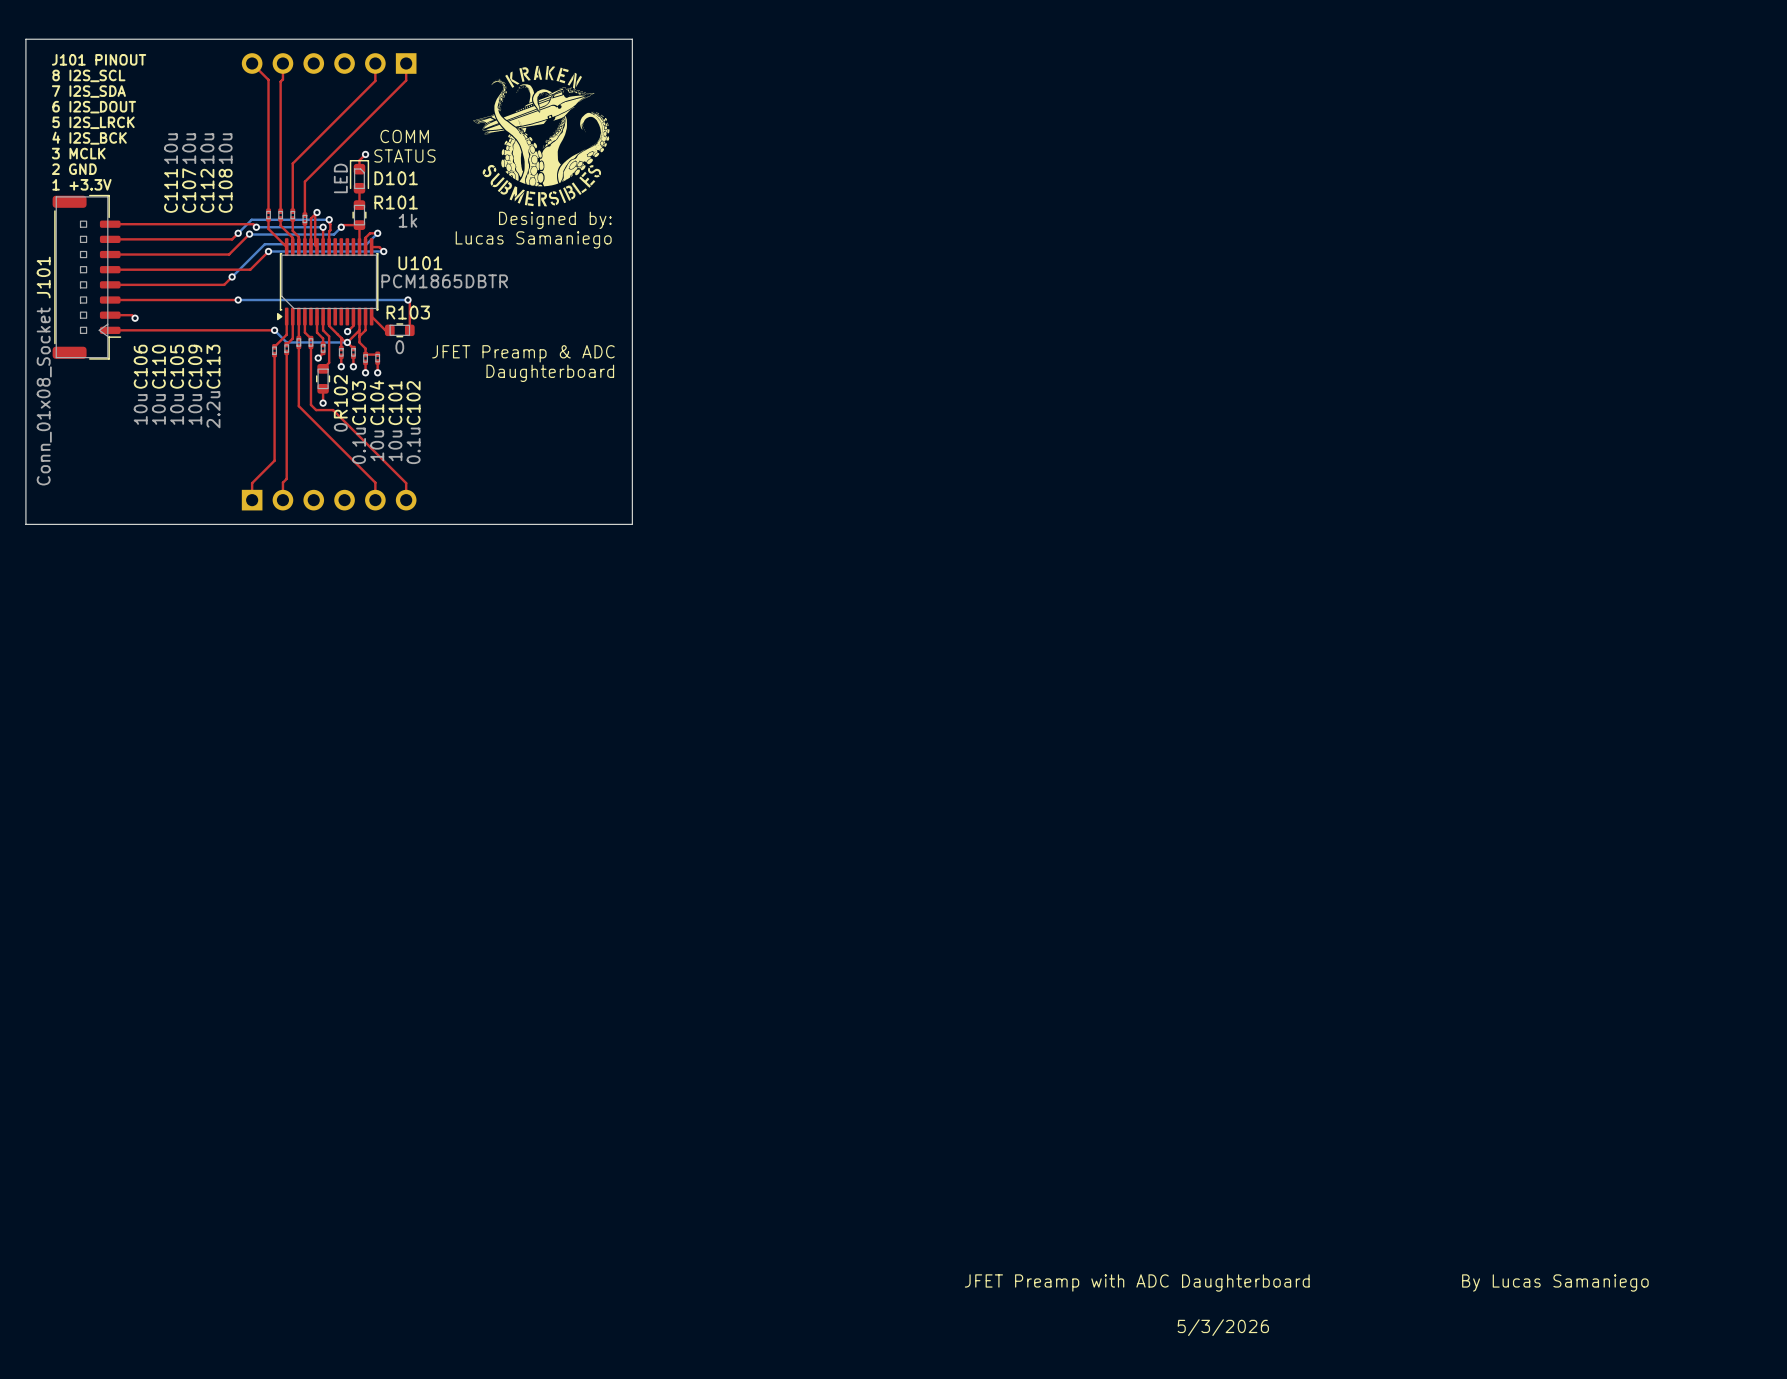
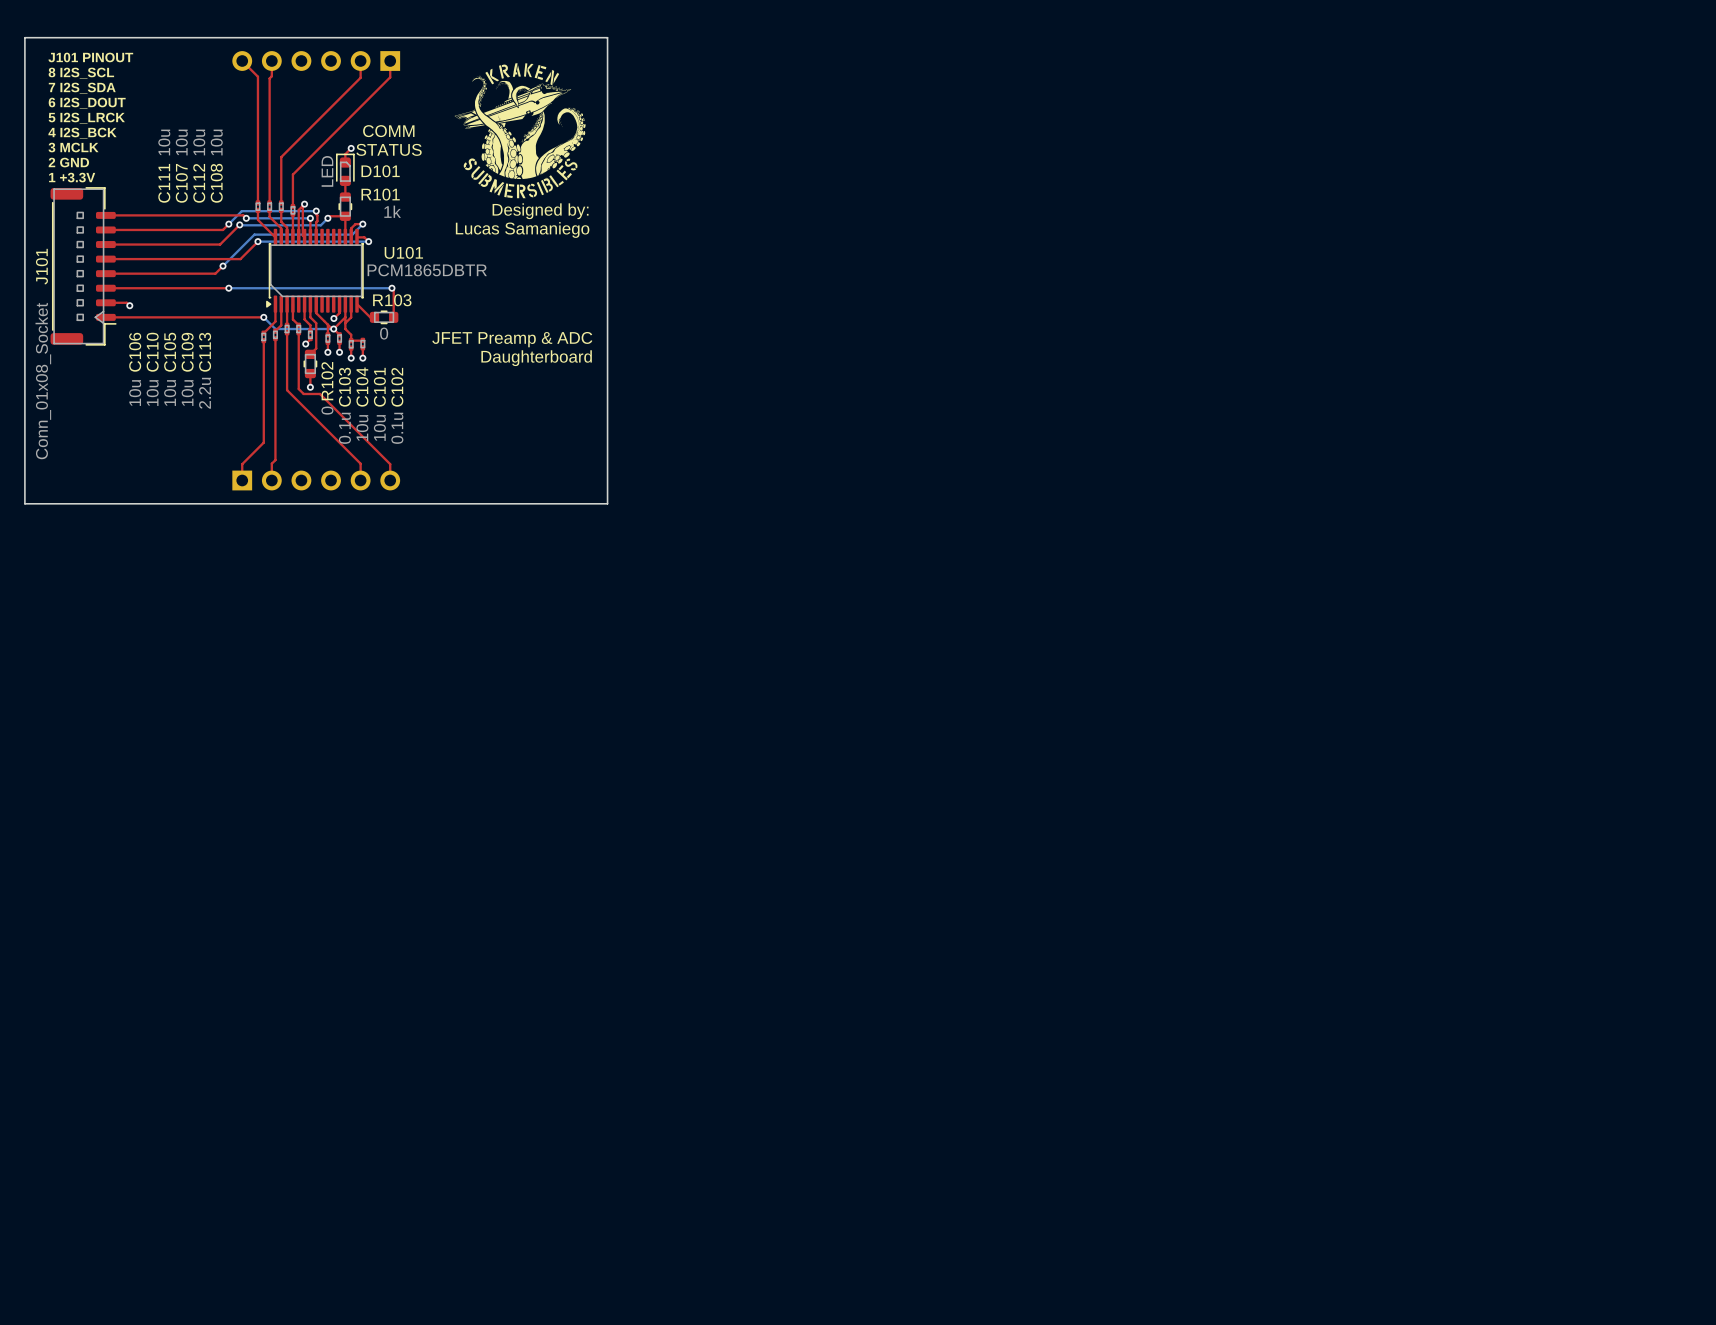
text: JFET Preamp with ADC Daughterboard By Lucas Samaniego (1306, 1282) -> none
text: 5/3/2026 (1223, 1327) -> none

